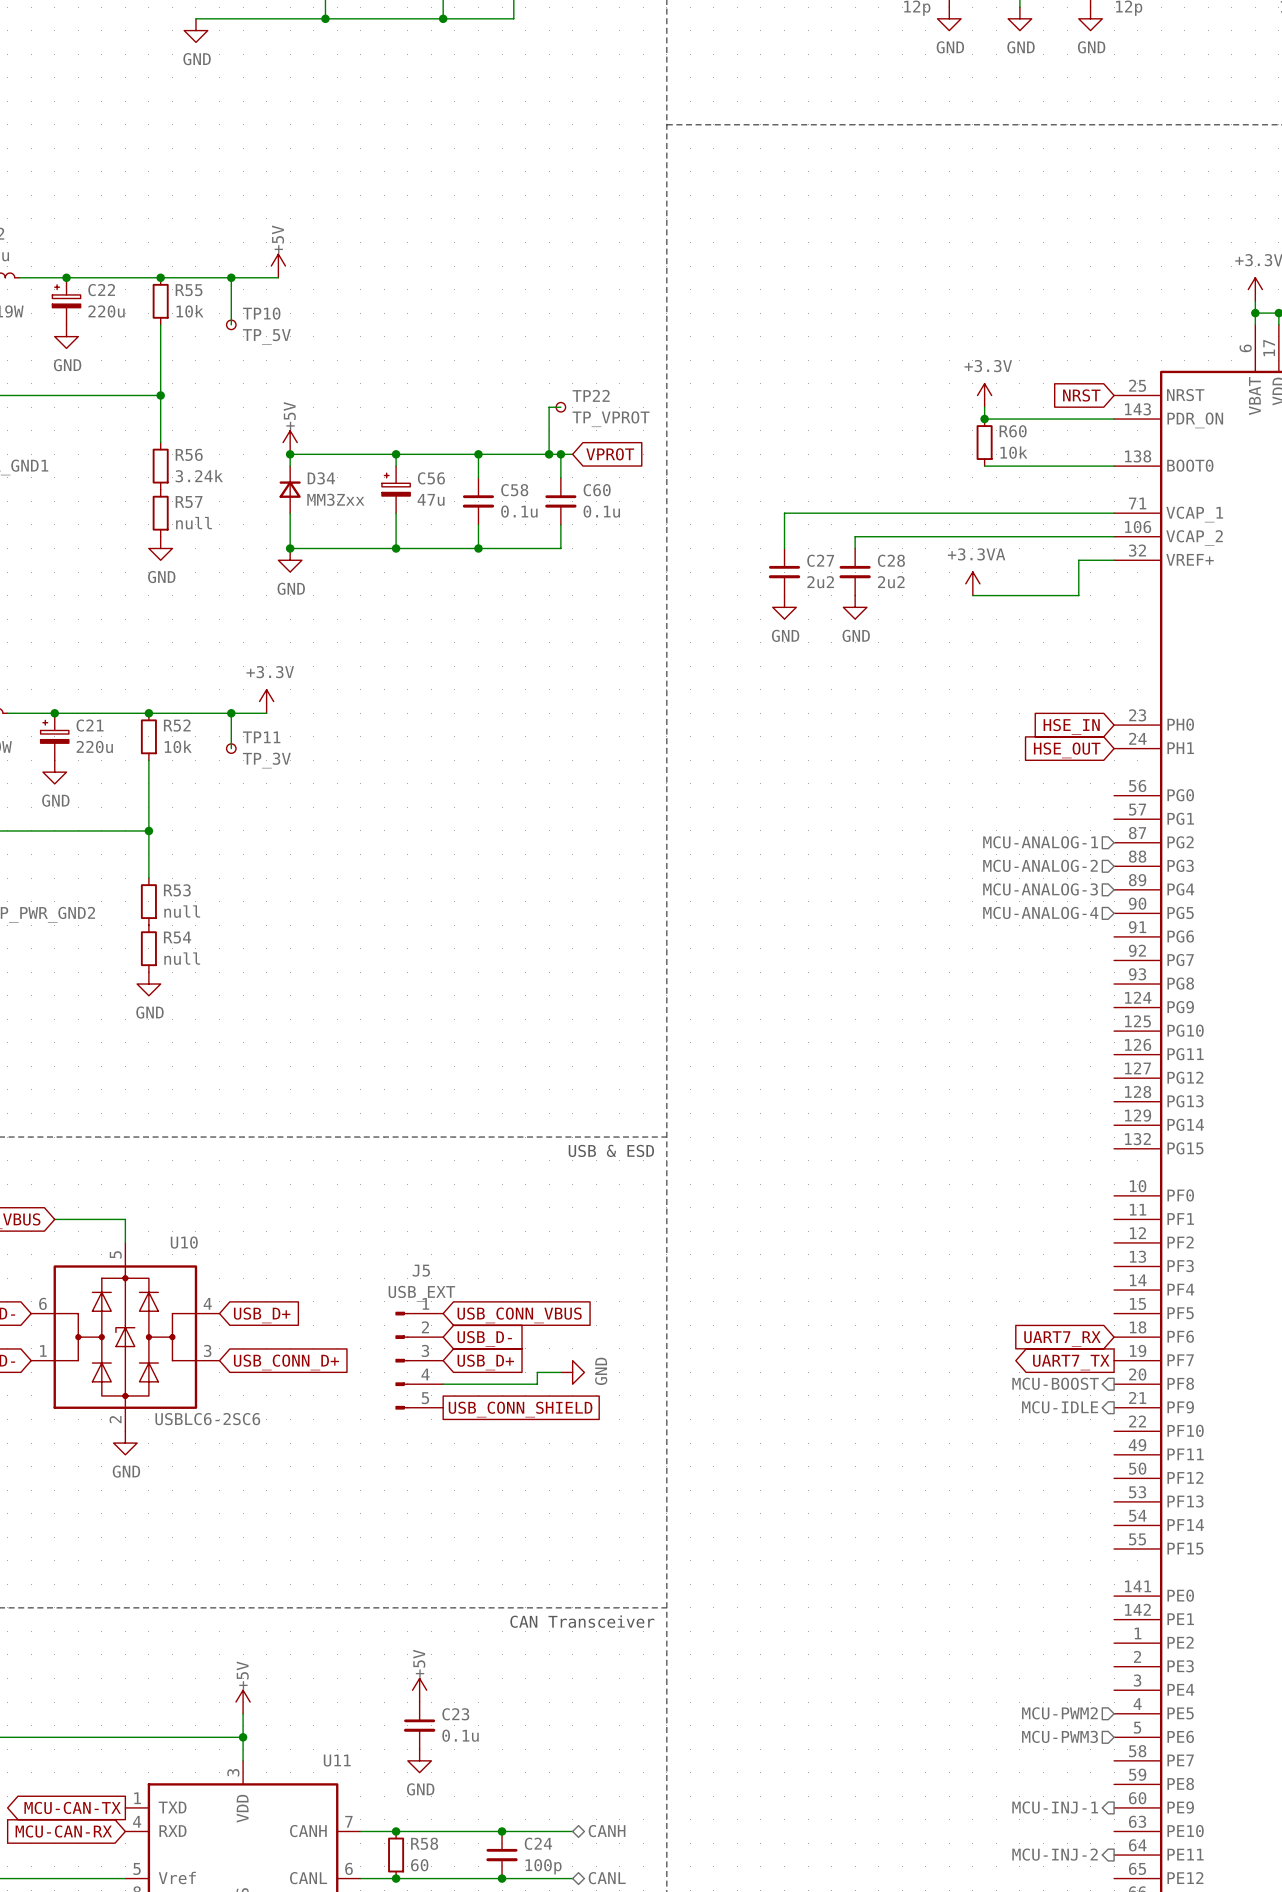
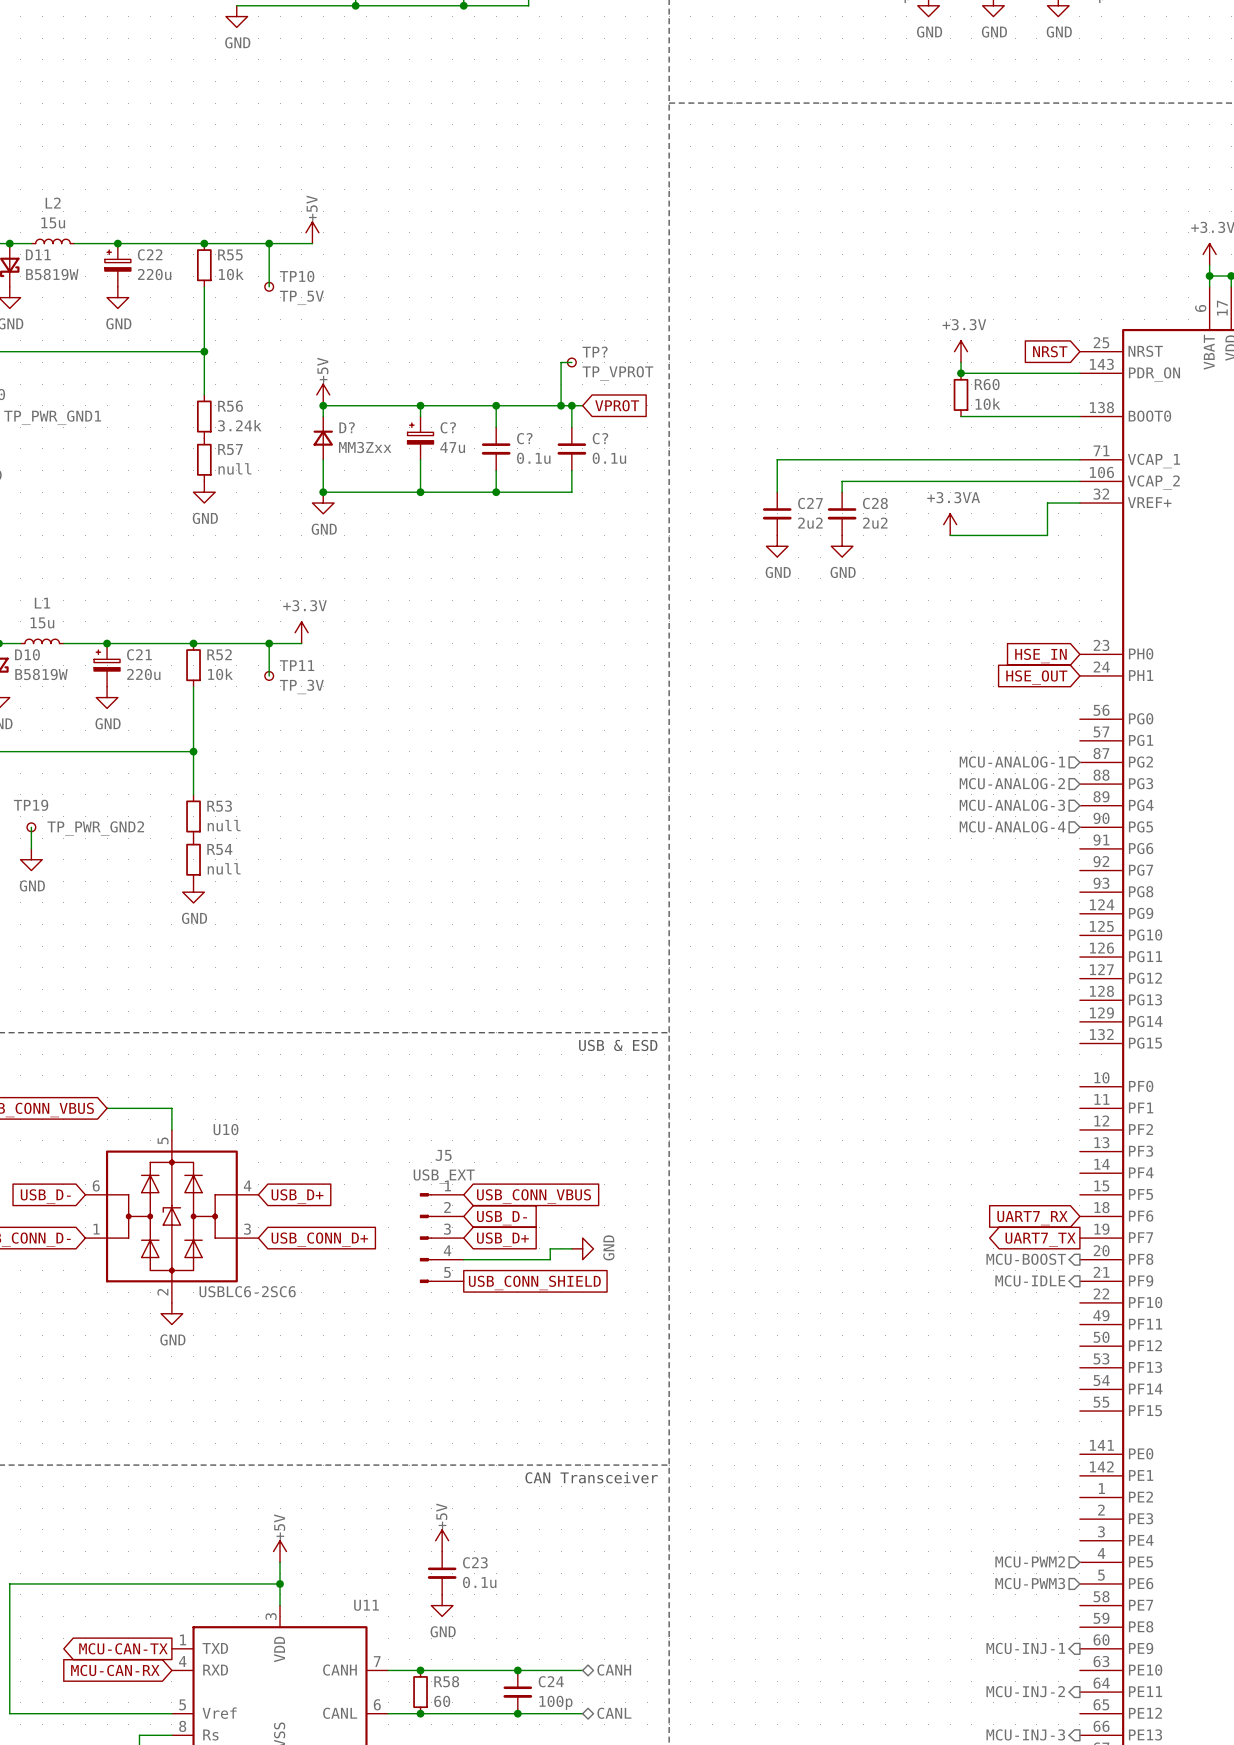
TP22 name: TP22 (591, 395) -> TP? (595, 352)
D34 name: D34 (321, 478) -> D? (347, 427)
C56 name: C56 (431, 478) -> C? (448, 427)
C58 name: C58 (514, 490) -> C? (524, 438)
C60 name: C60 (597, 490) -> C? (600, 438)

